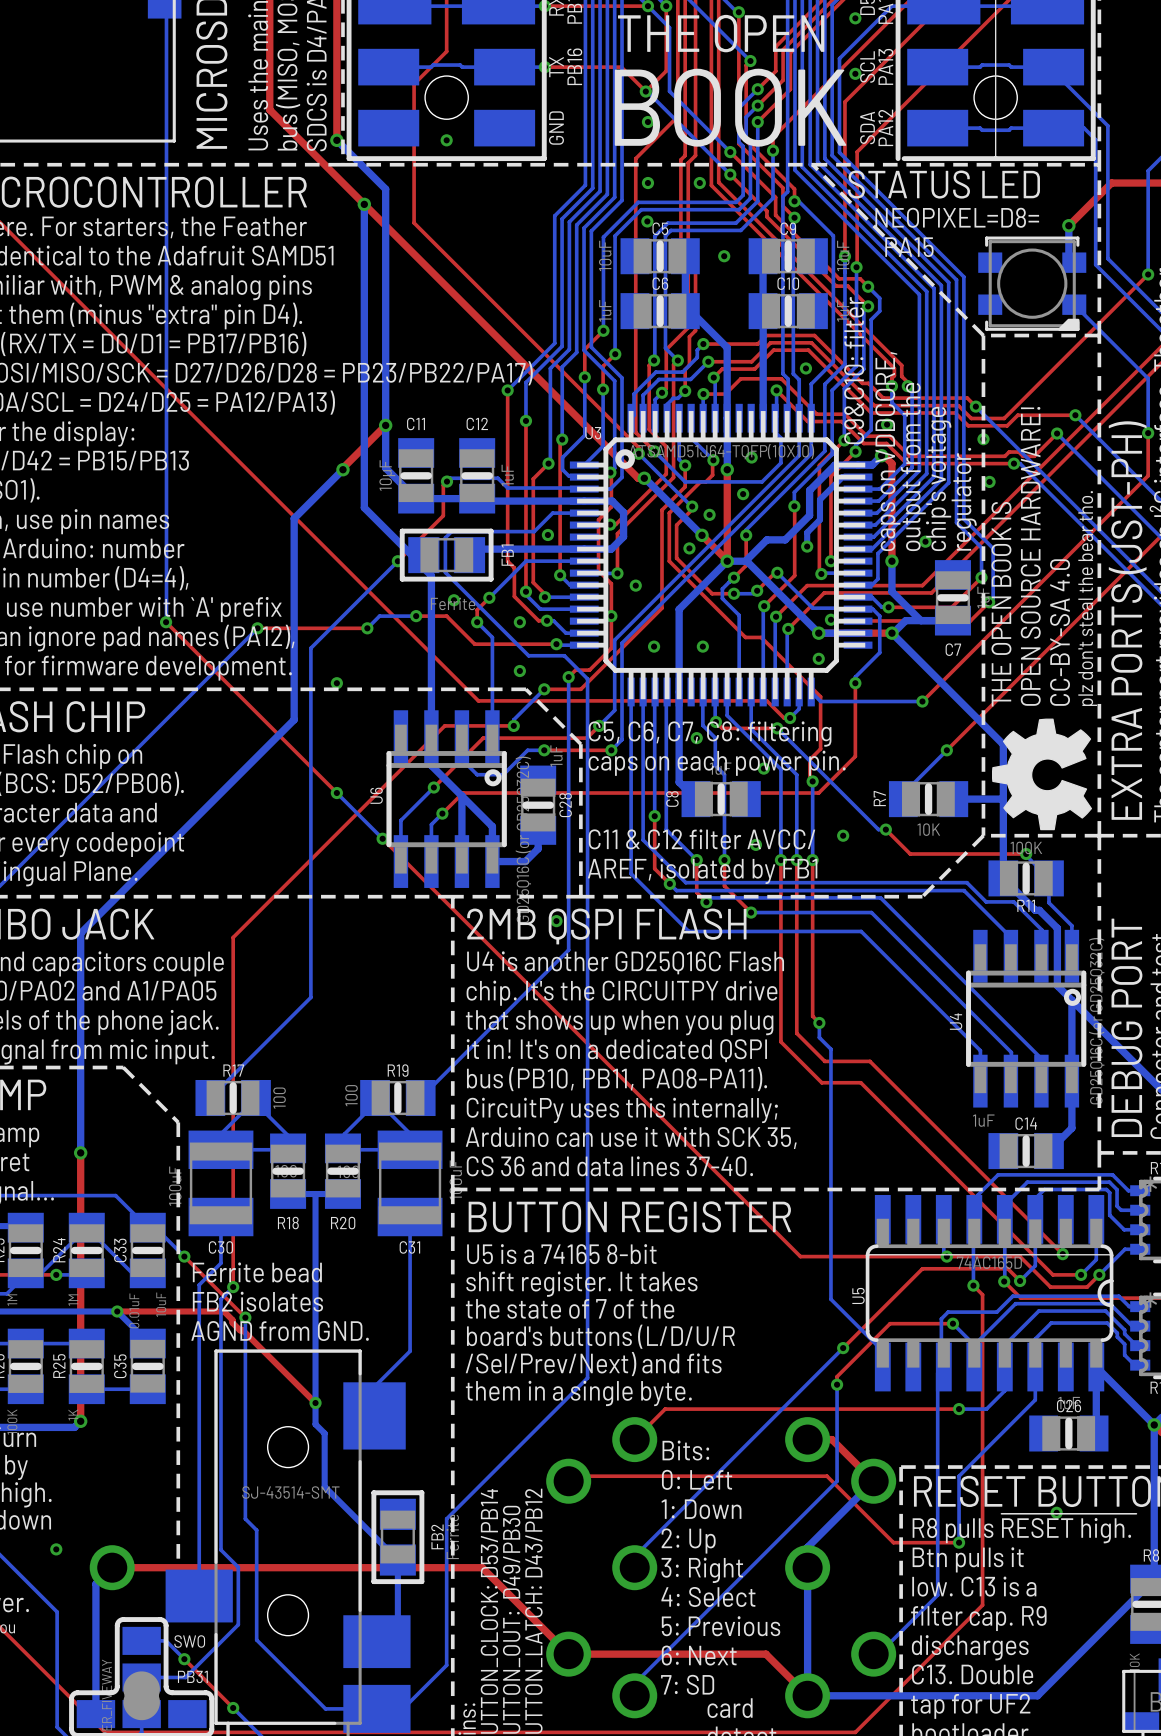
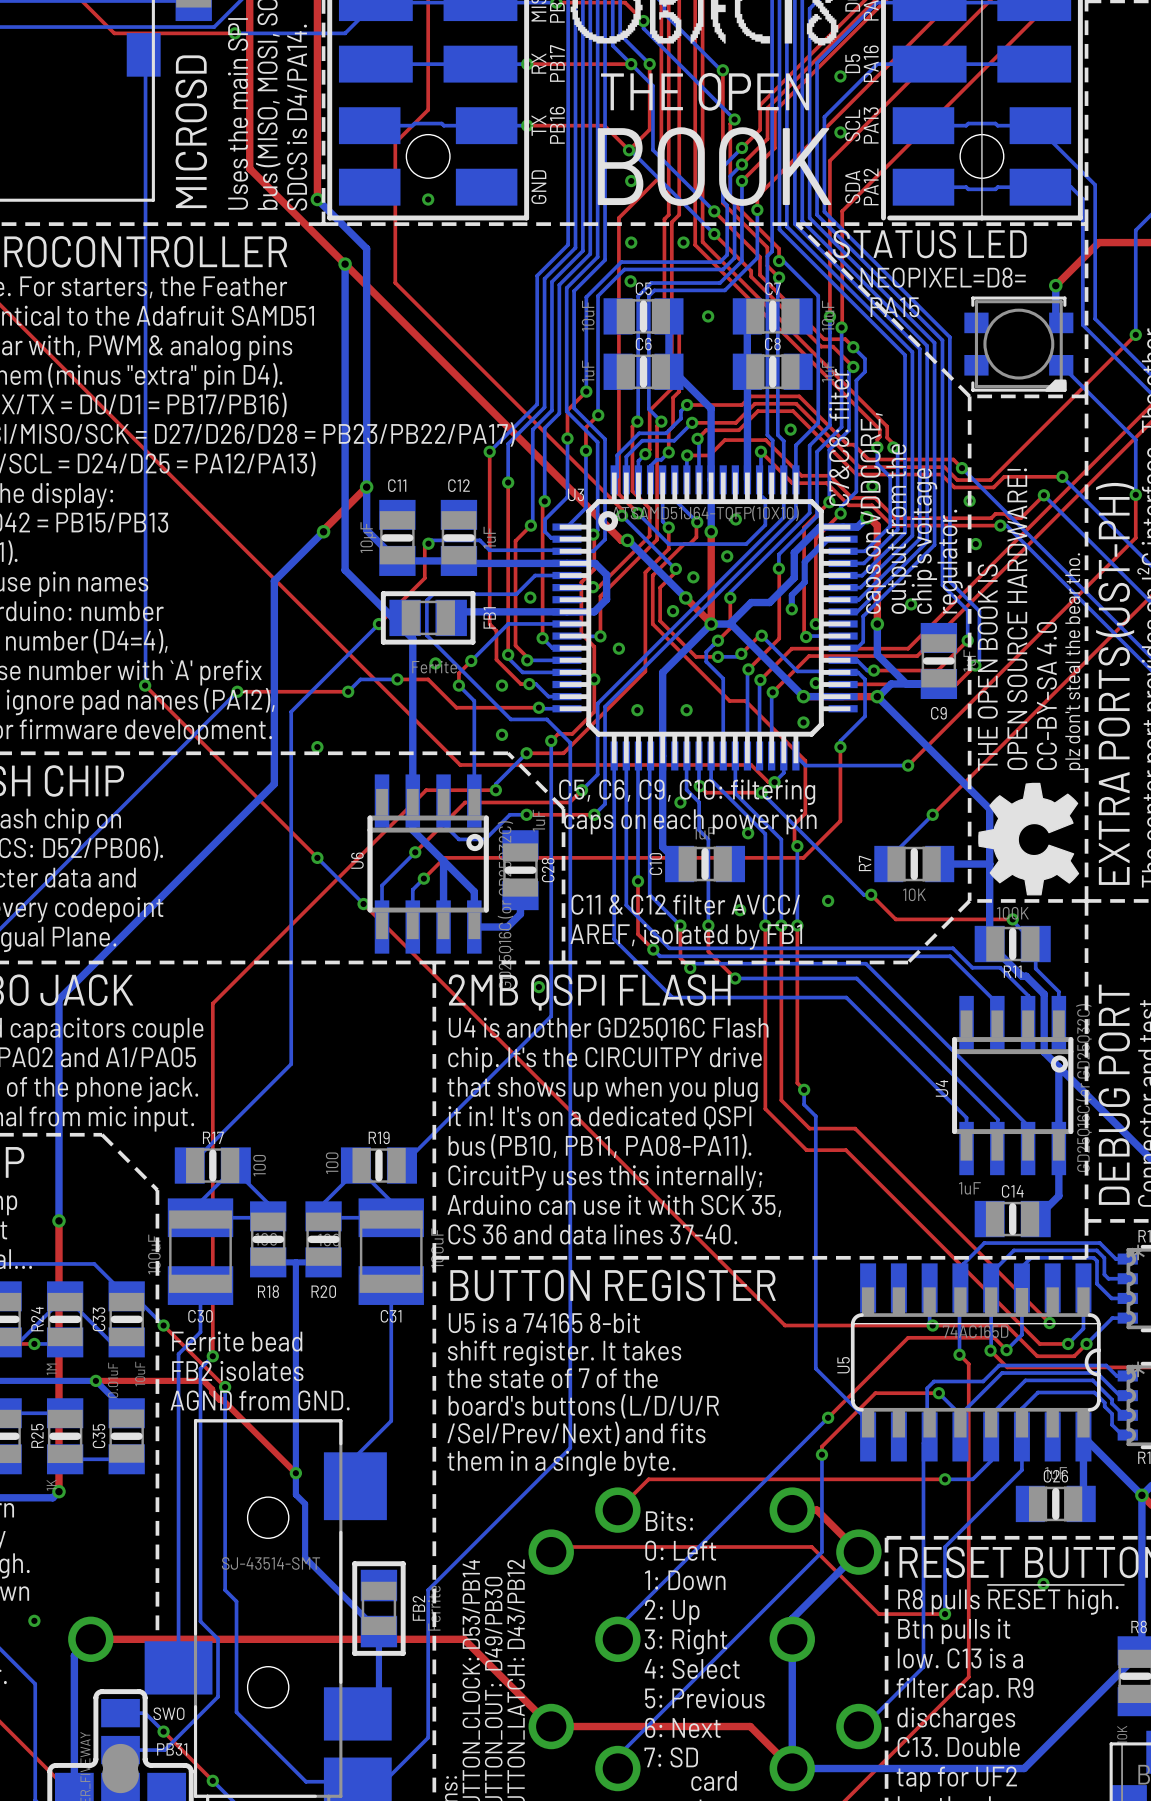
C9 name: C9 (788, 228) -> C7 (773, 288)
C10 name: C10 (788, 283) -> C8 (772, 344)
text: C9&C10: filter (854, 370) -> C7&C8: filter (839, 437)
C7 name: C7 (953, 649) -> C9 (938, 713)
text: C5, C6, C7, C8: filtering (710, 734) -> C5, C6, C9, C10: filtering (687, 792)
text: caps on each power pin. (717, 763) -> caps on each power pin (690, 821)
C8 name: C8 (672, 799) -> C10 (655, 864)

